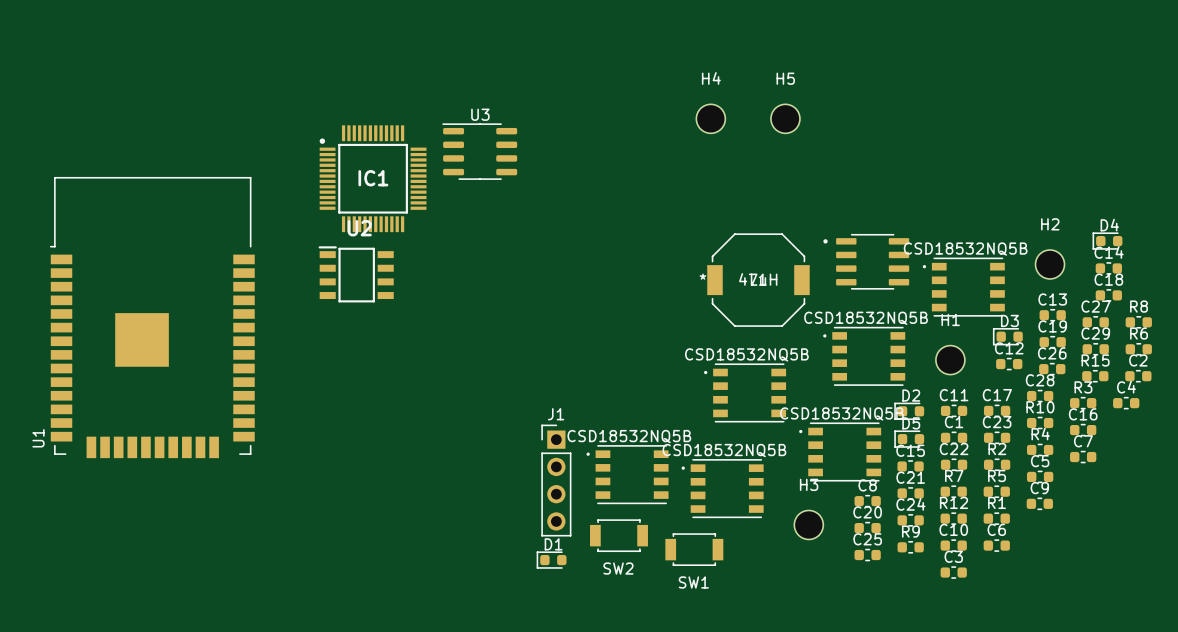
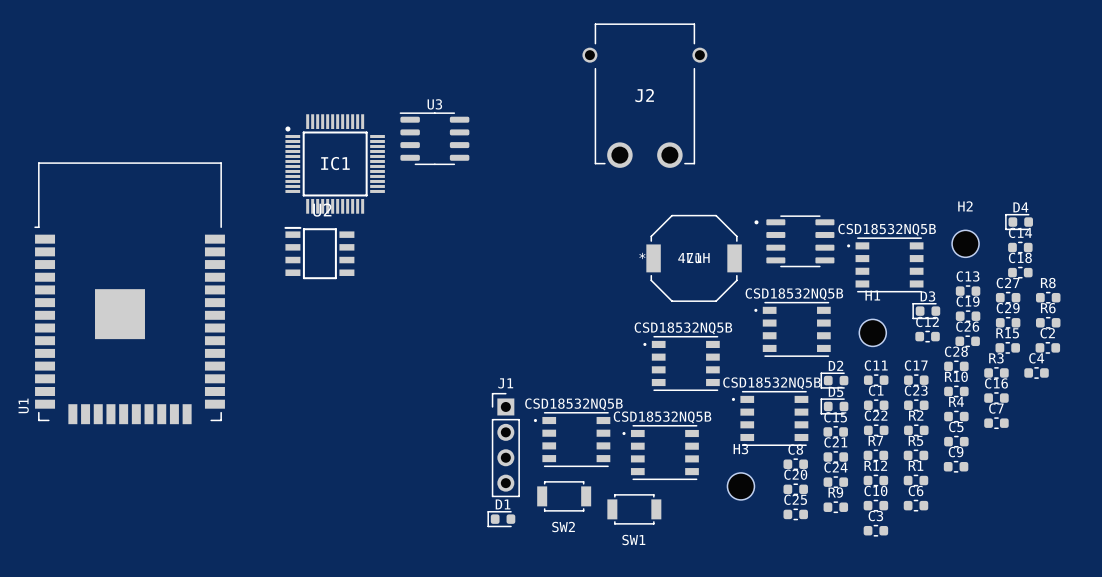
J2: none -> (644, 95)
H4: (710, 118) -> none
H5: (785, 118) -> none

